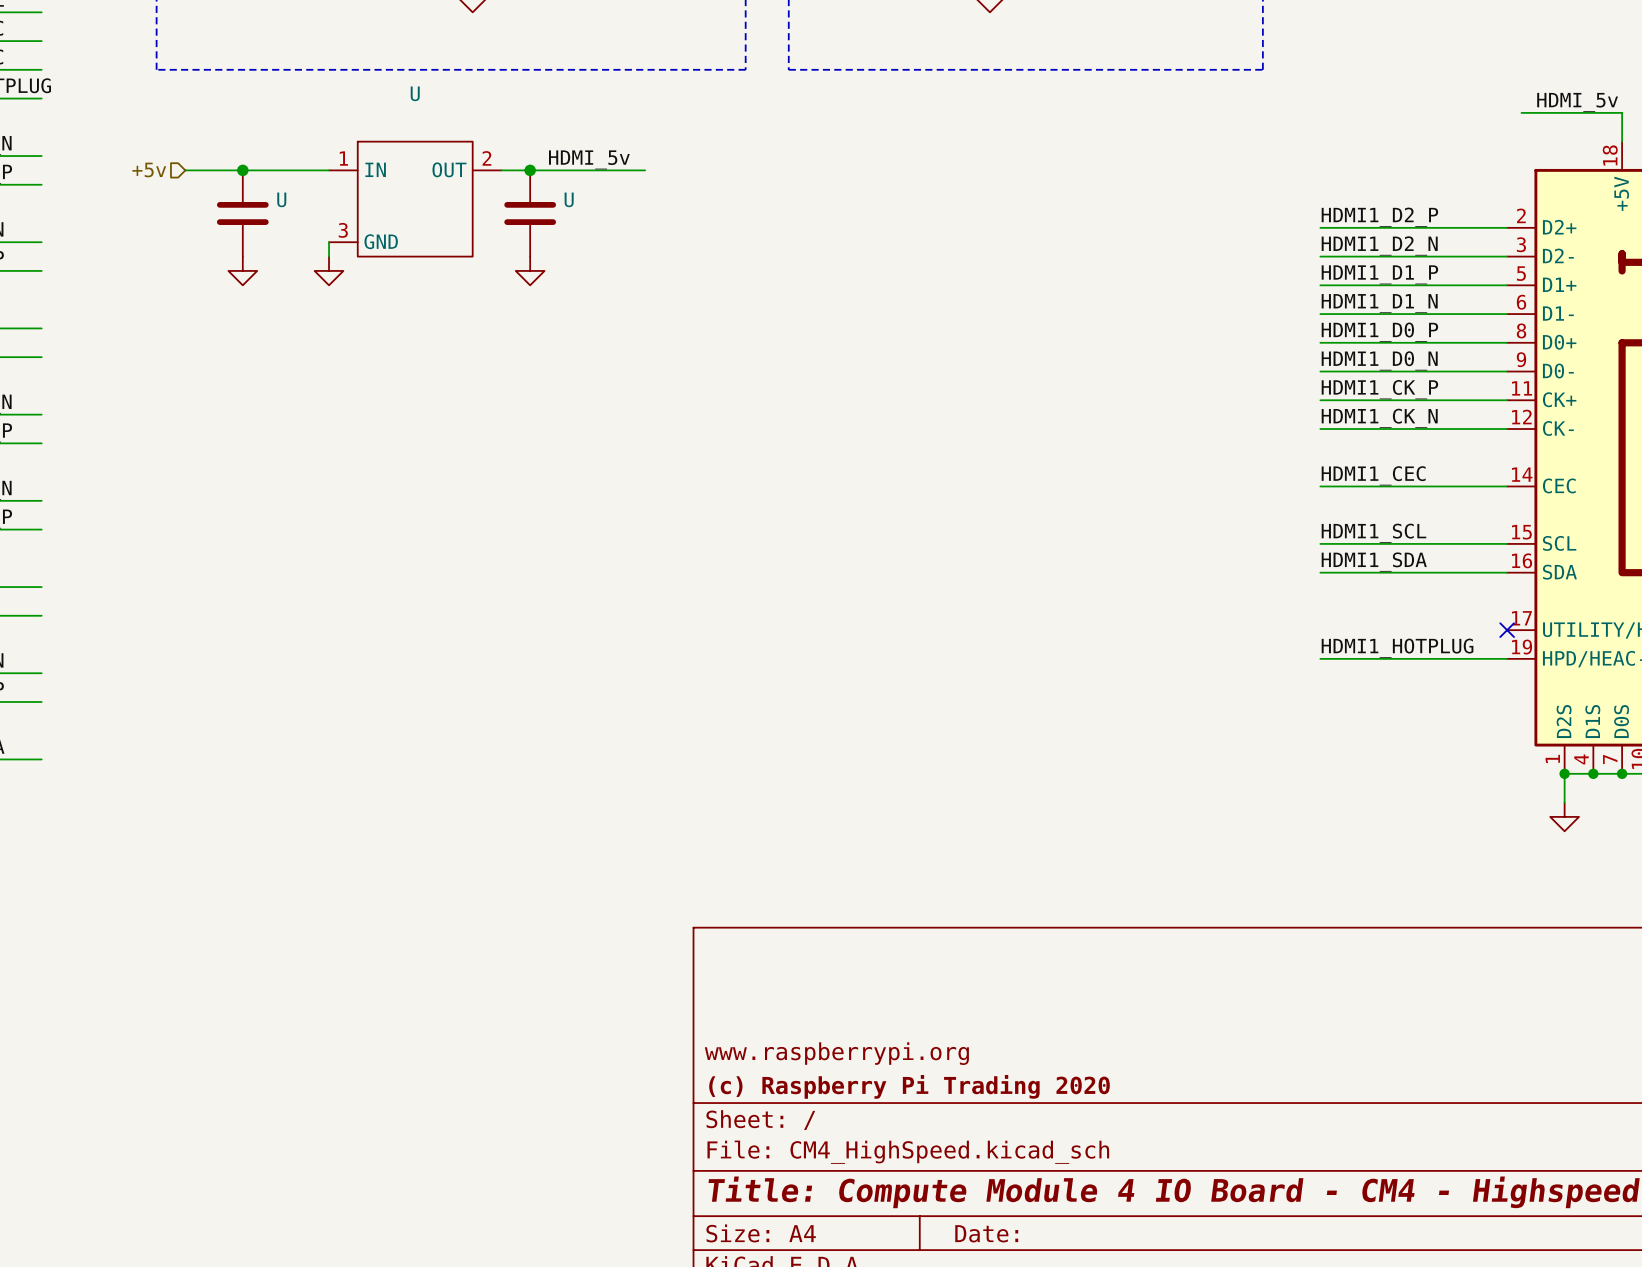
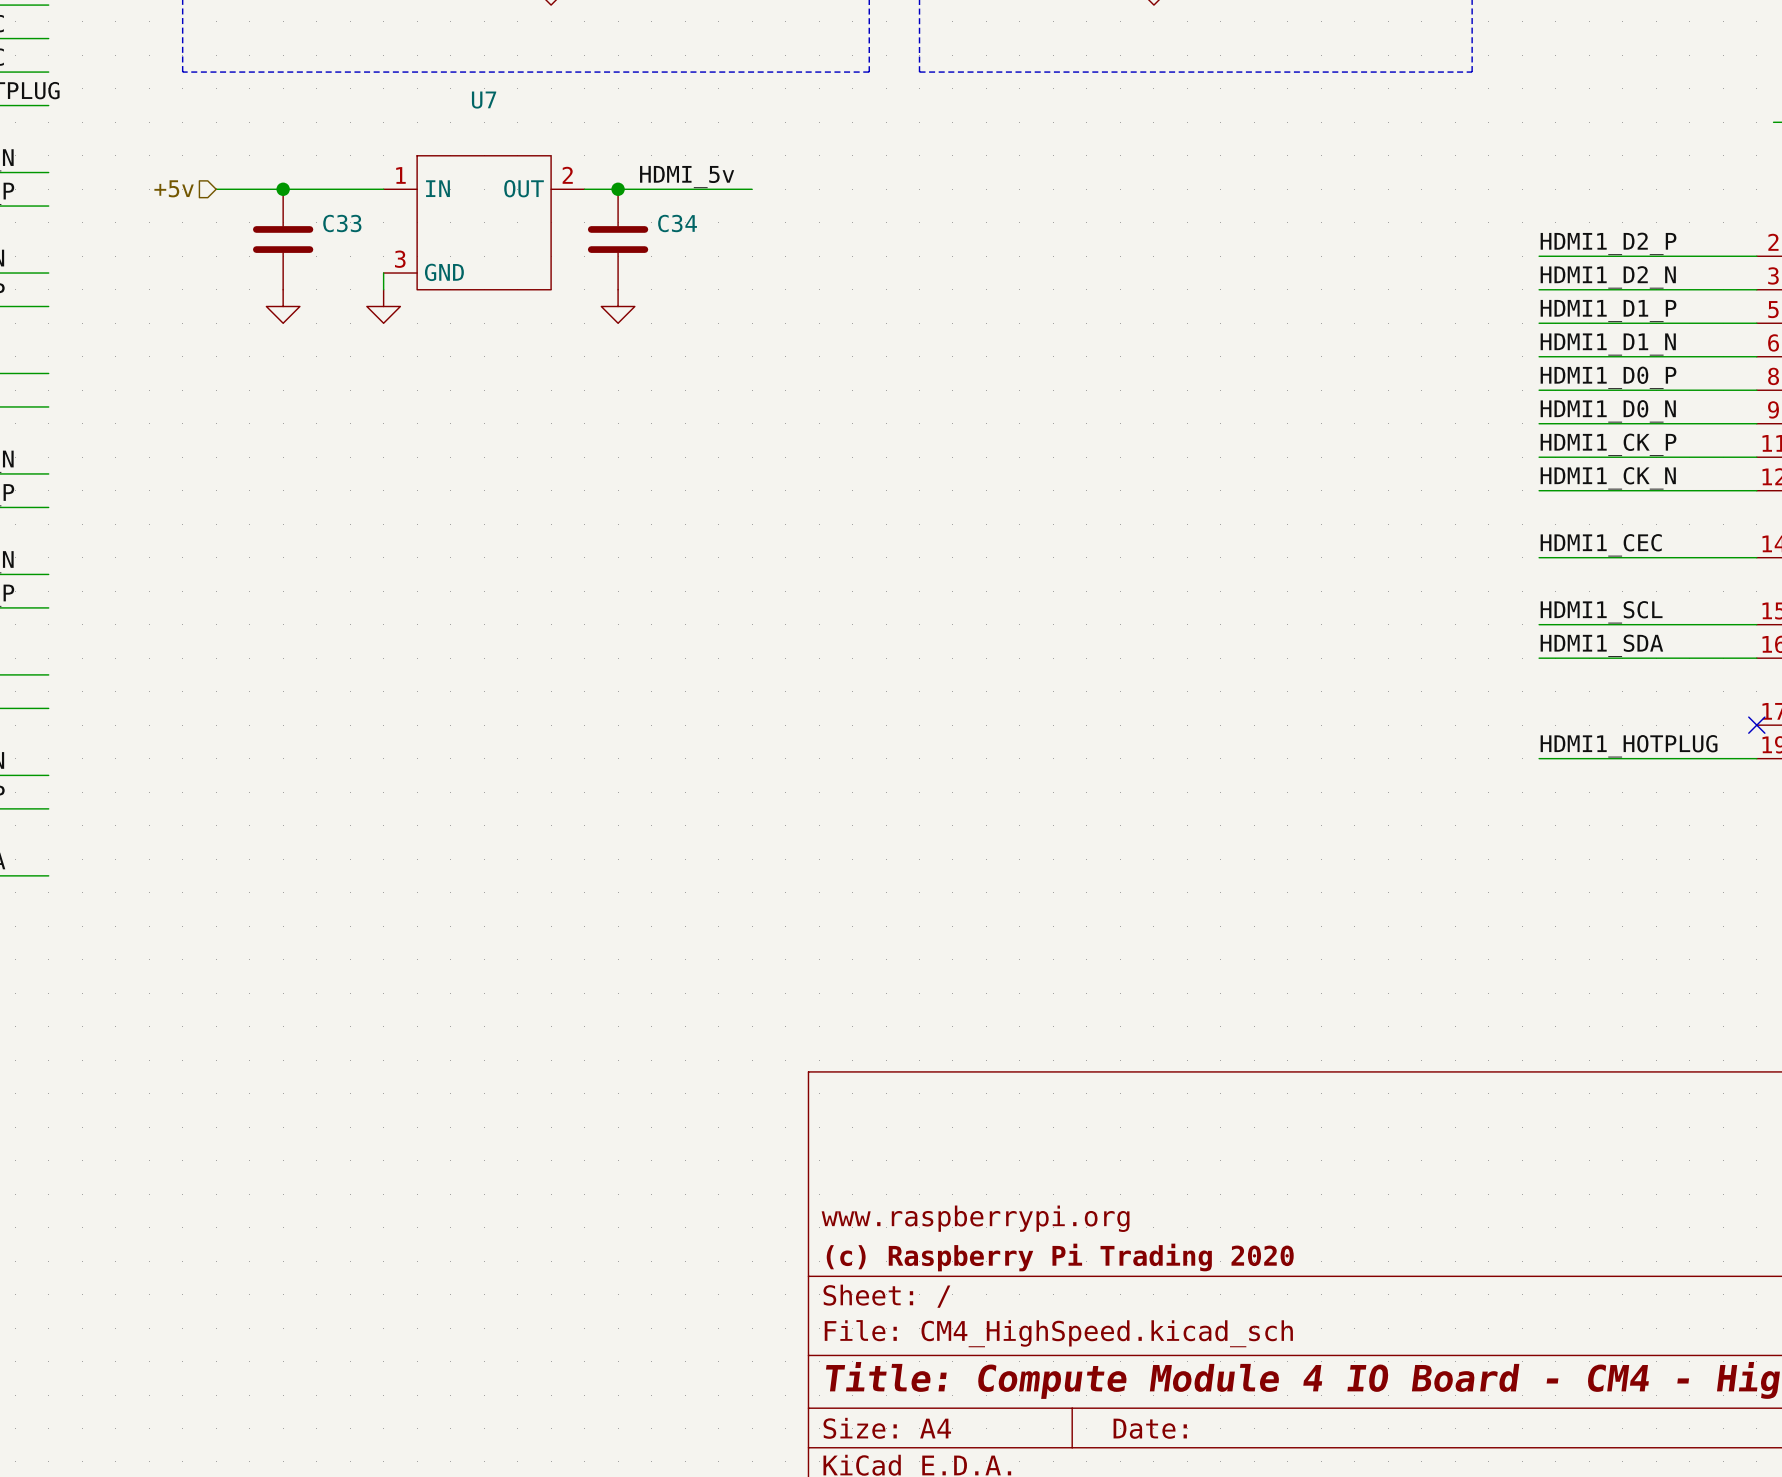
U name: U (415, 93) -> U7 (484, 100)
U name: U (281, 199) -> C33 (342, 223)
U name: U (569, 199) -> C34 (677, 223)

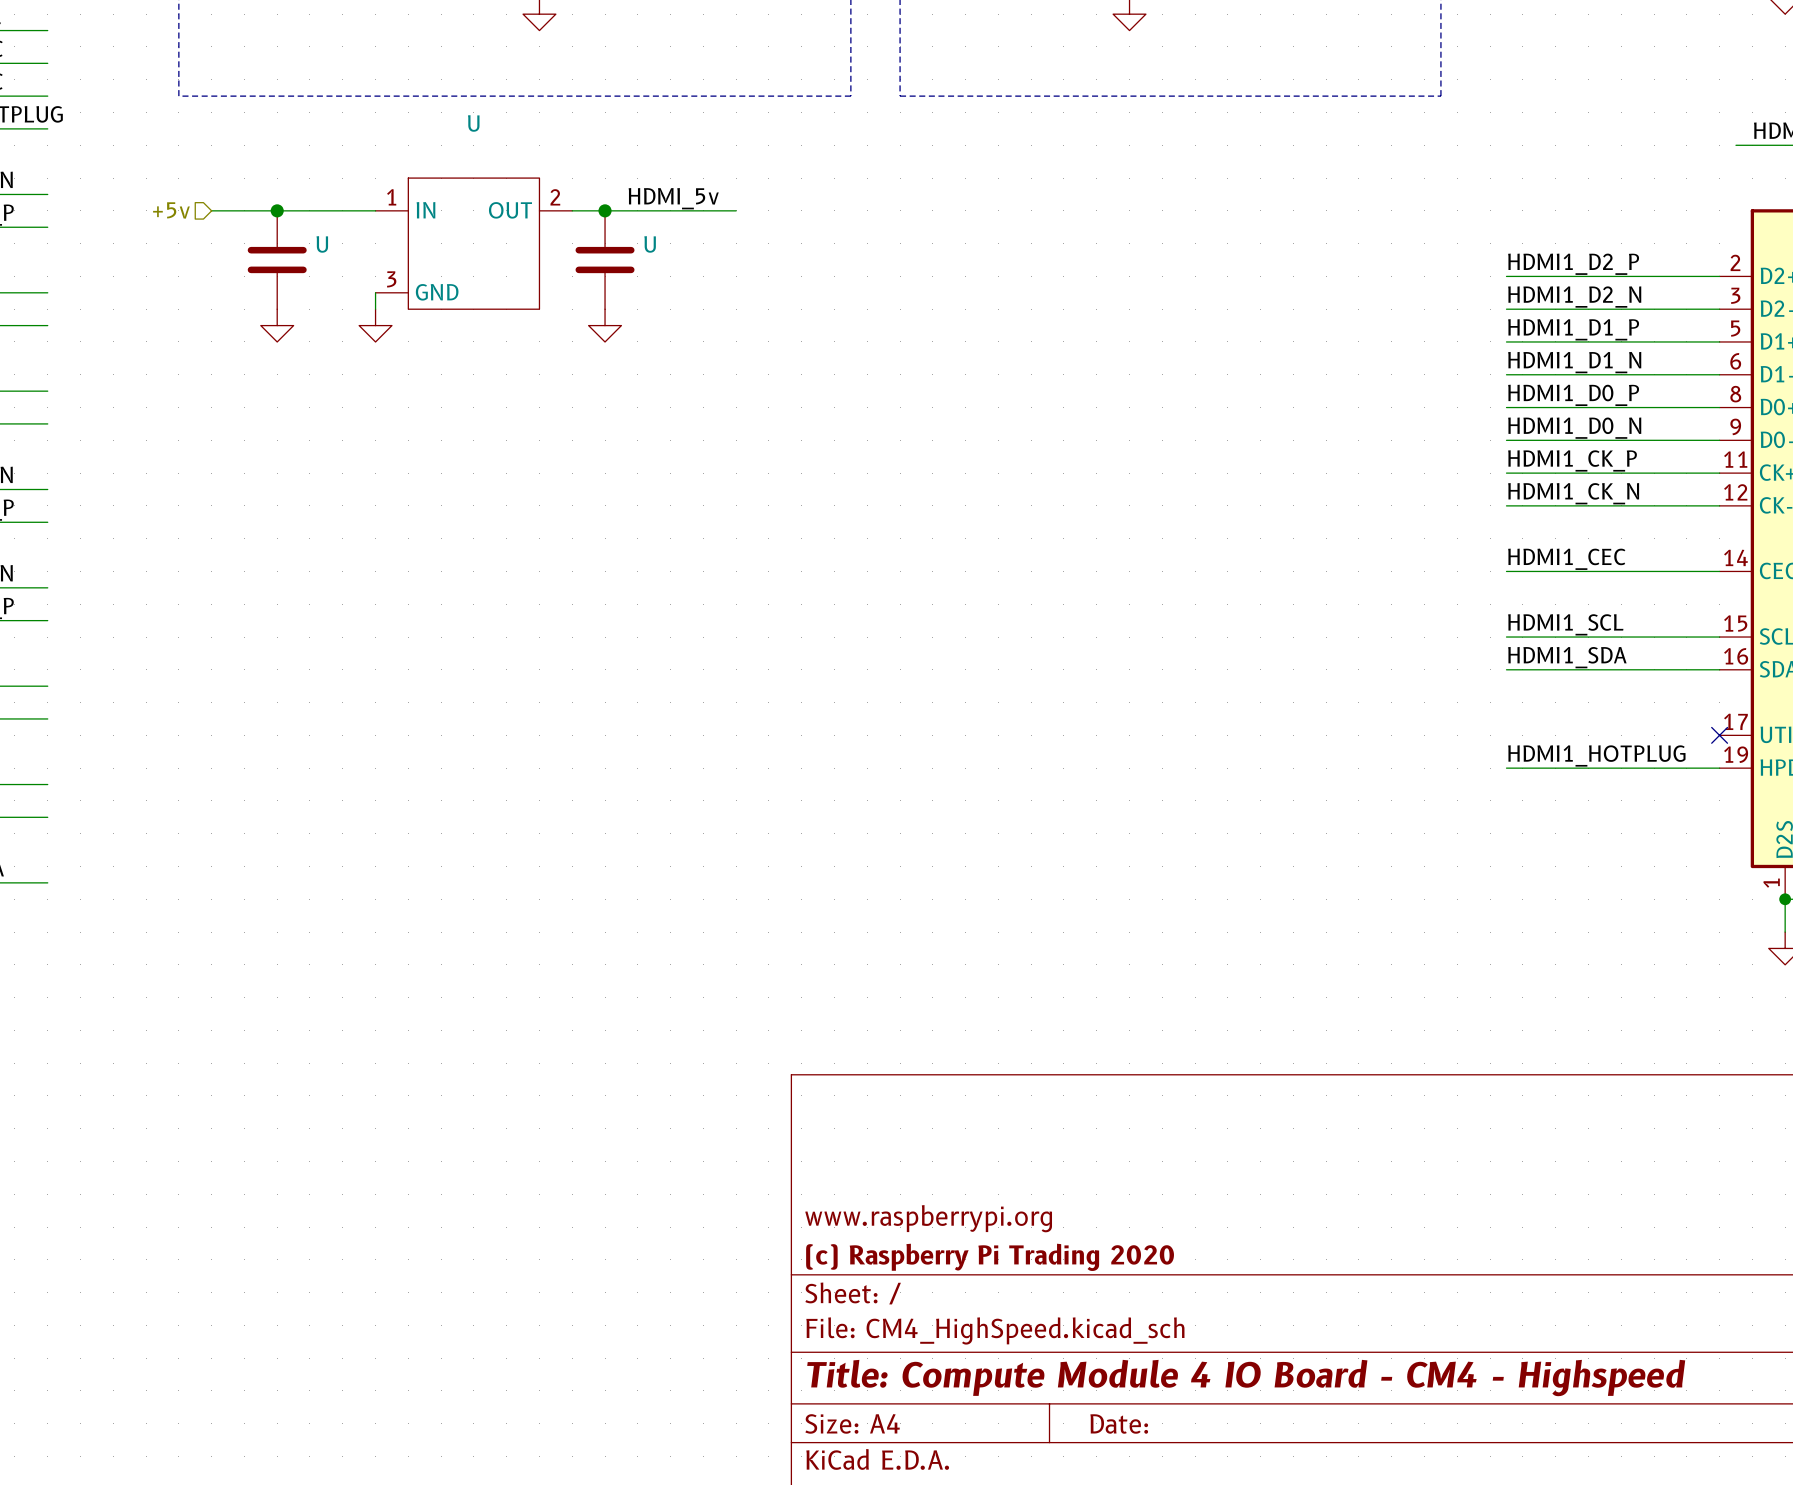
U7 name: U7 (484, 100) -> U (473, 123)
C33 name: C33 (342, 223) -> U (322, 244)
C34 name: C34 (677, 223) -> U (650, 244)

